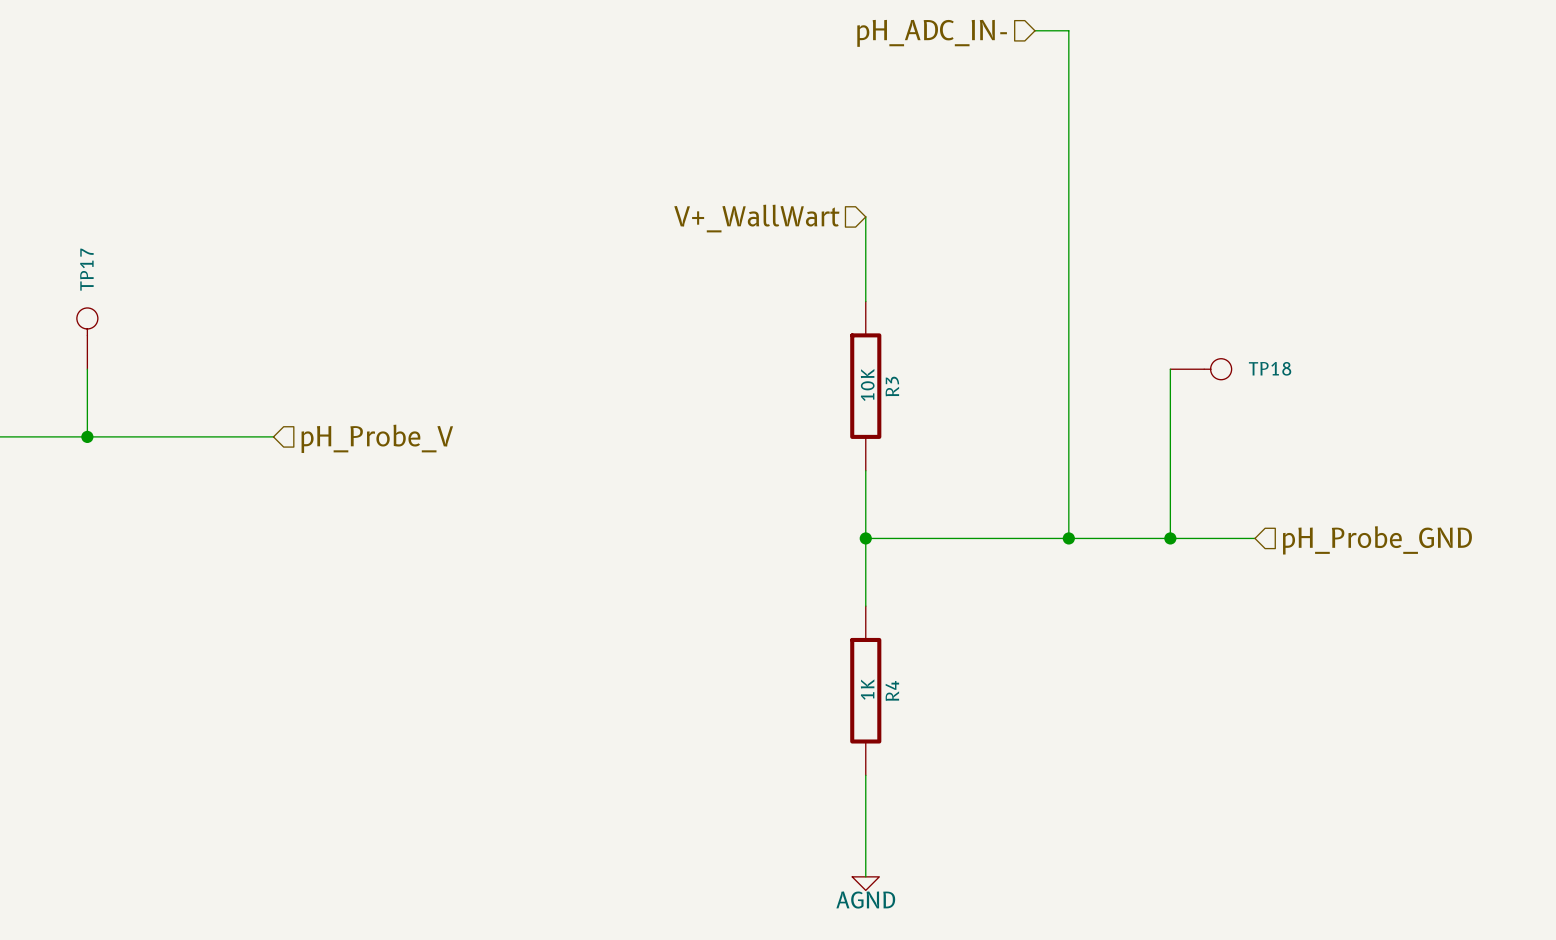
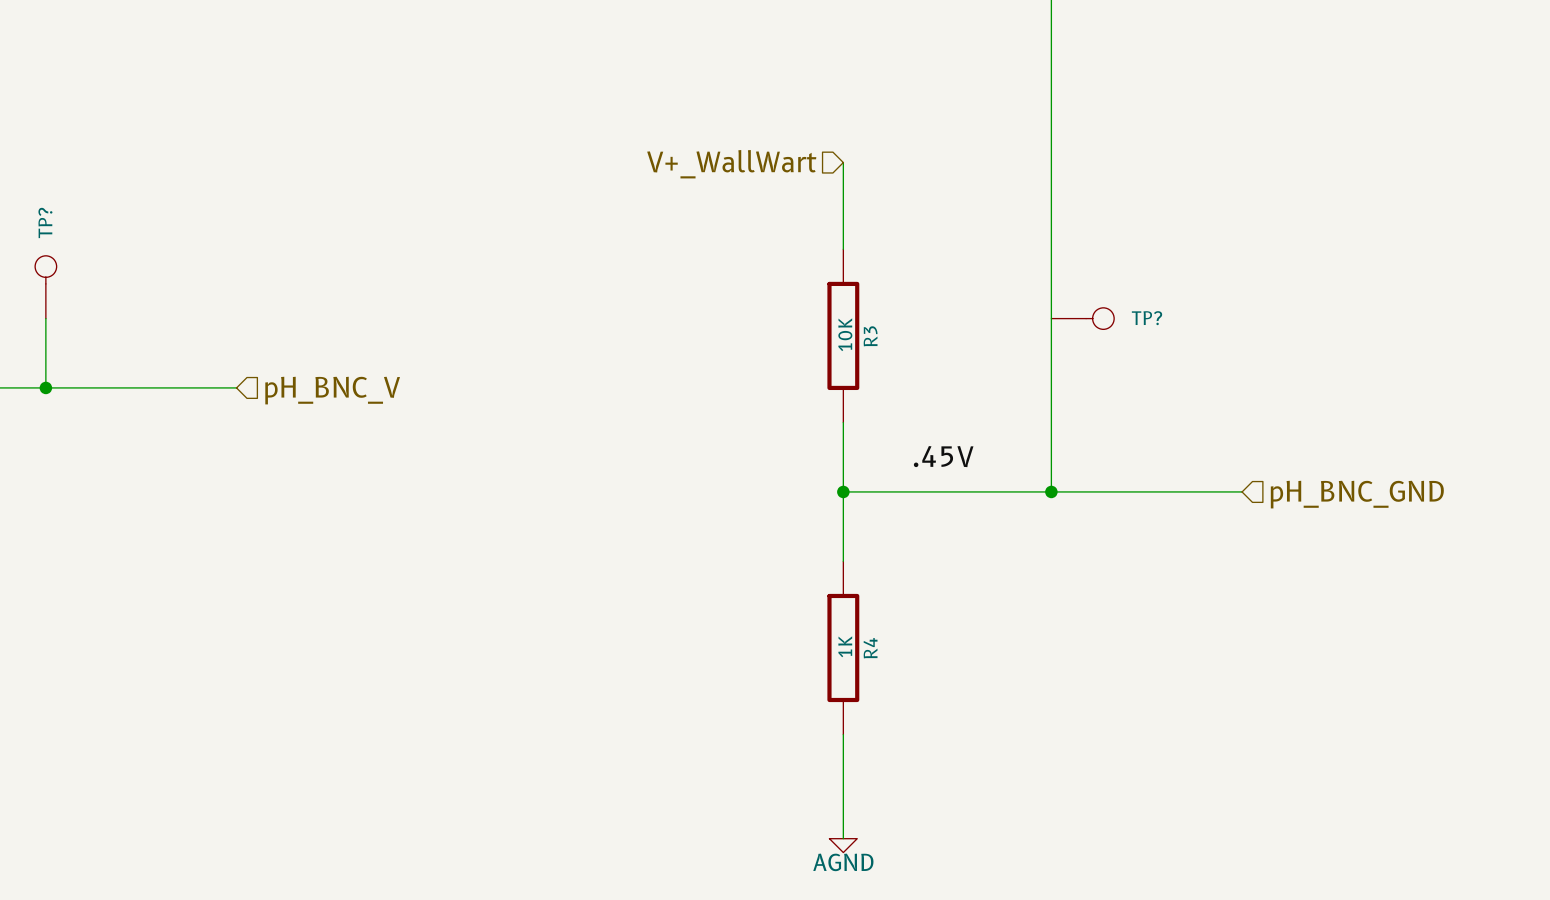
TP17 name: TP17 (86, 269) -> TP? (45, 222)
TP?: none -> (1082, 318)
wire: (1170, 369) (1170, 538) -> none
TP18: (1200, 369) -> none
hierarchical label: pH_Probe_V (377, 438) -> pH_BNC_V (332, 390)
label: none -> .45V (943, 456)
junction: (1170, 538) -> none
hierarchical label: pH_Probe_GND (1377, 540) -> pH_BNC_GND (1357, 494)

